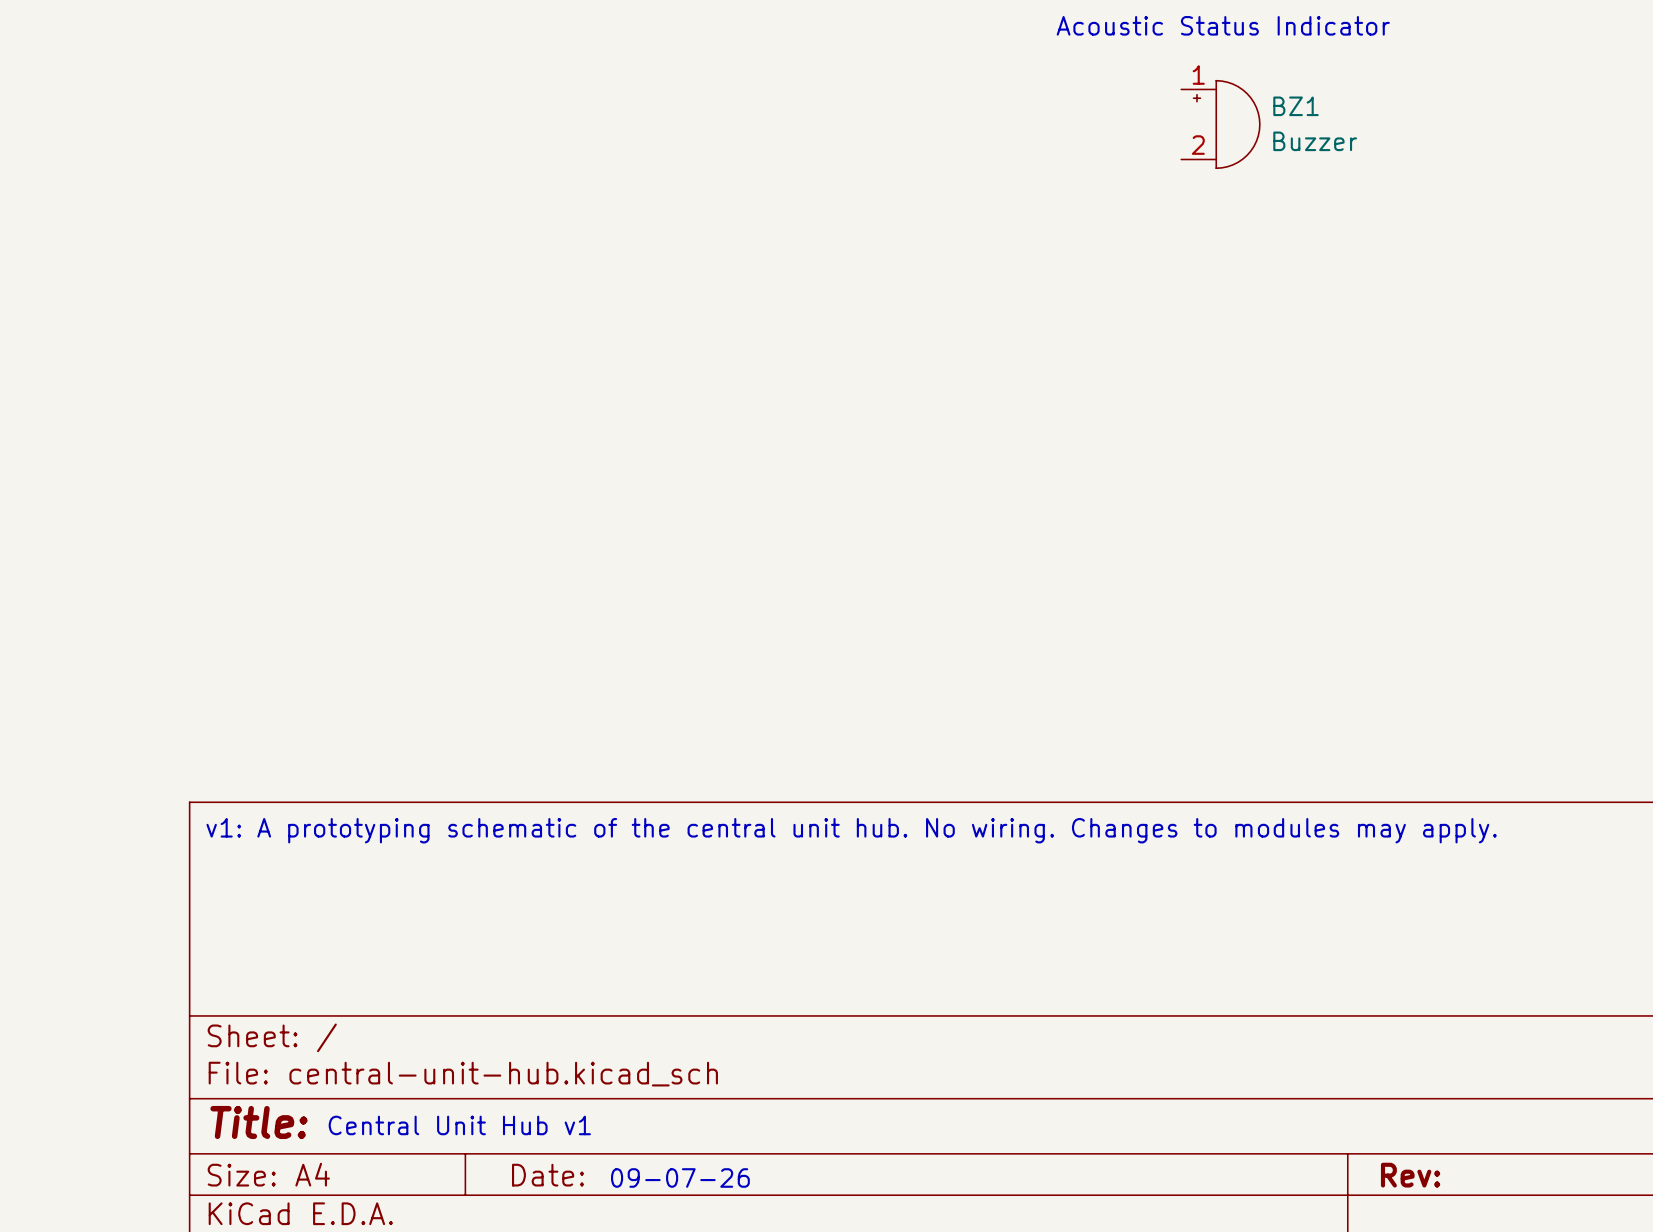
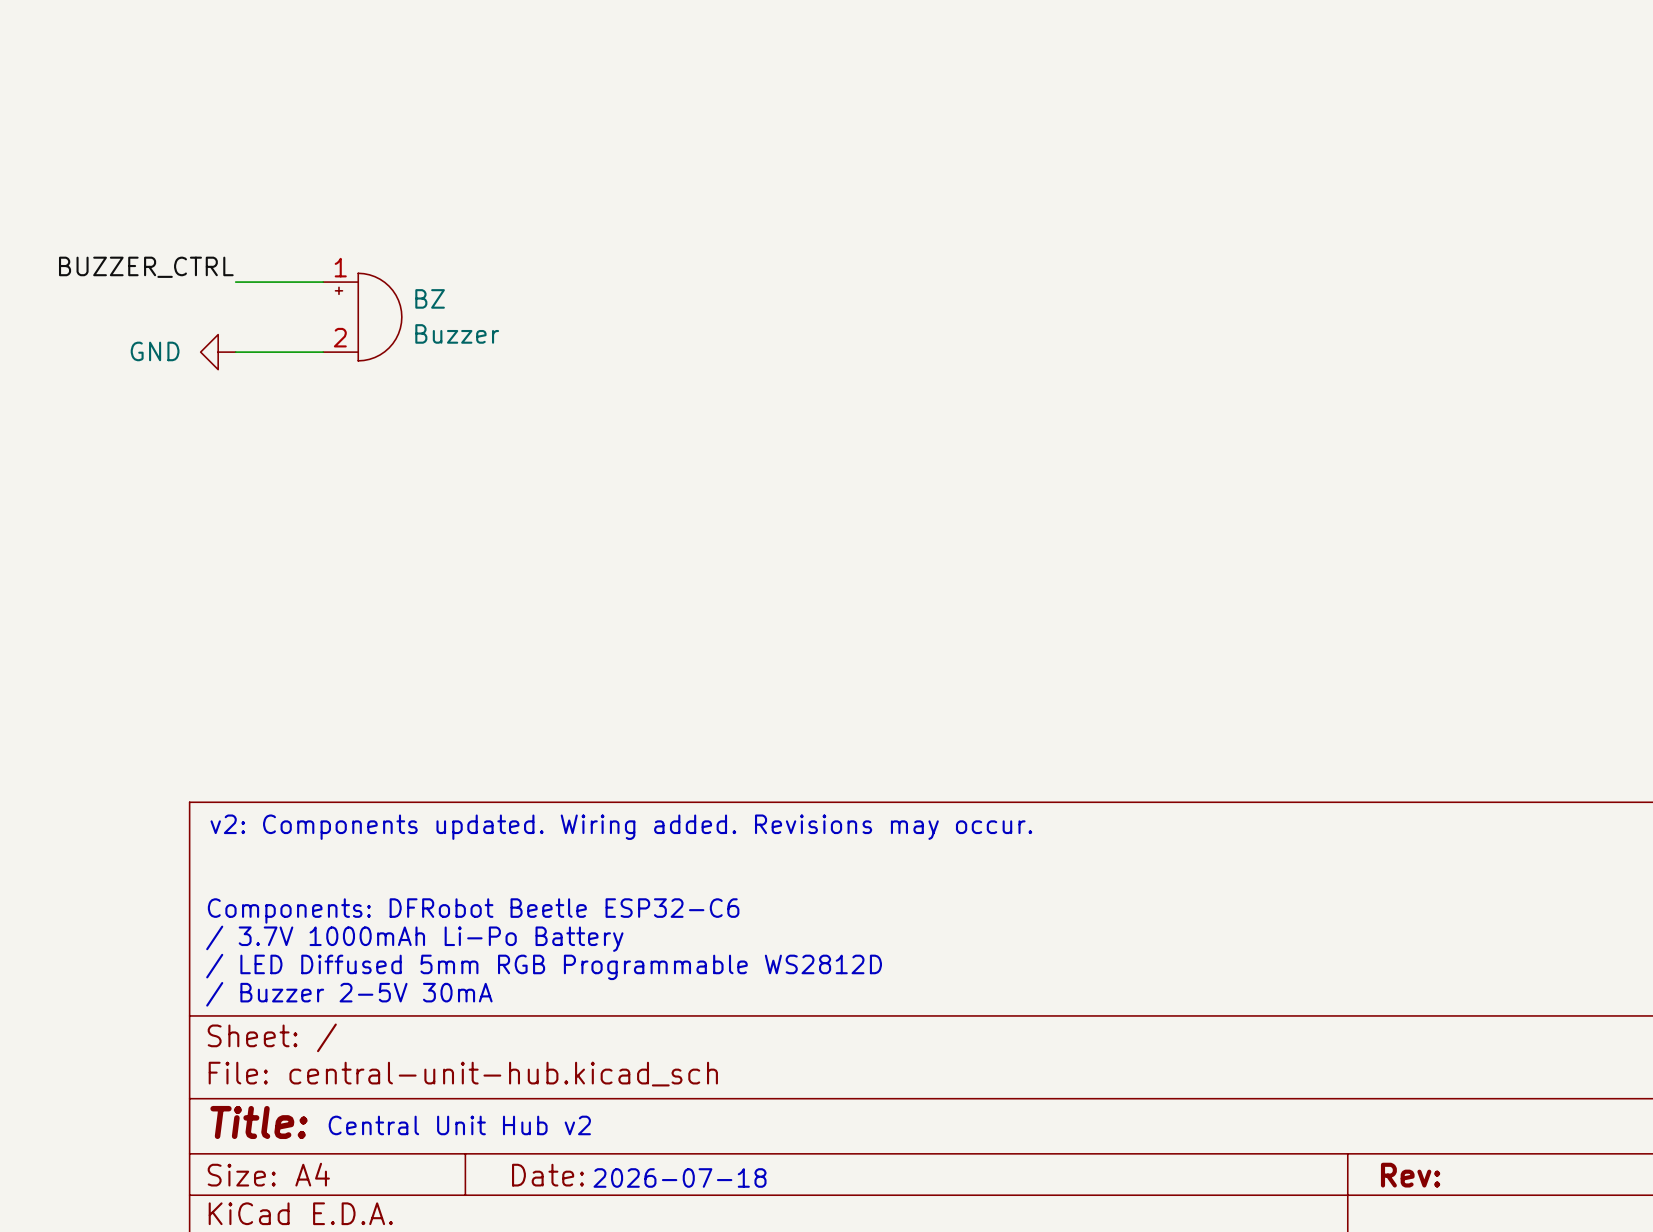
text: Acoustic Status Indicator (1223, 25) -> none
BZ1: Buzzer (1220, 124) -> none
label: none -> BUZZER_CTRL (146, 267)
wire: none -> (235, 282) (323, 282)
BZ: none -> Buzzer (362, 317)
power symbol: none -> GND (218, 352)
wire: none -> (235, 352) (323, 352)
text: none -> v2: Components updated. Wiring added. Revisions may occur. (621, 827)
text: v1: A prototyping schematic of the central unit hub. No wiring. Changes to modules may apply. (851, 830) -> none
text: none -> Components: DFRobot Beetle ESP32-C6 (473, 910)
text: none -> / 3.7V 1000mAh Li-Po Battery (414, 938)
text: none -> / LED Diffused 5mm RGB Programmable WS2812D (544, 966)
text: none -> / Buzzer 2-5V 30mA (349, 994)
text: Central Unit Hub v1 (459, 1125) -> Central Unit Hub v2 (459, 1125)
text: 09-07-26 (680, 1177) -> 2026-07-18 (680, 1177)

